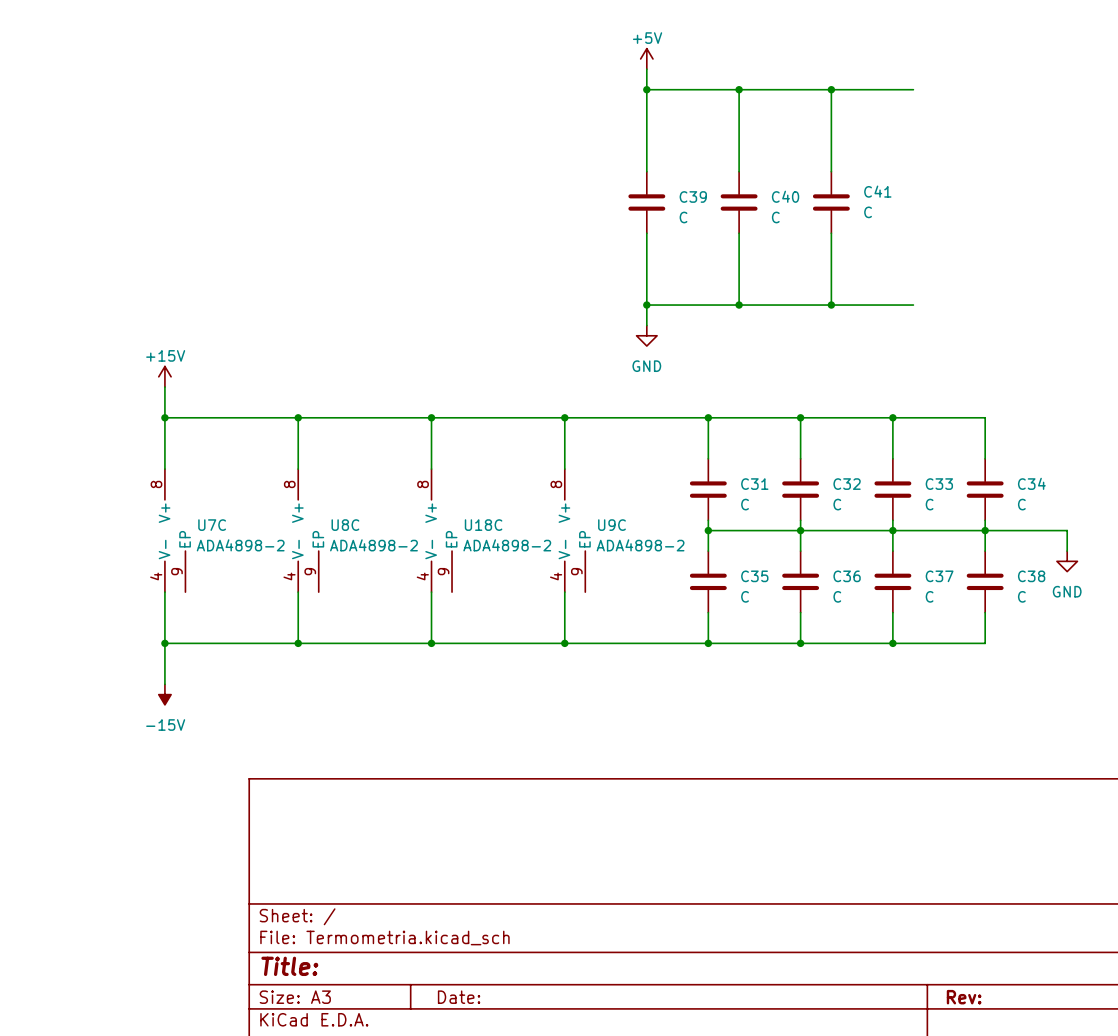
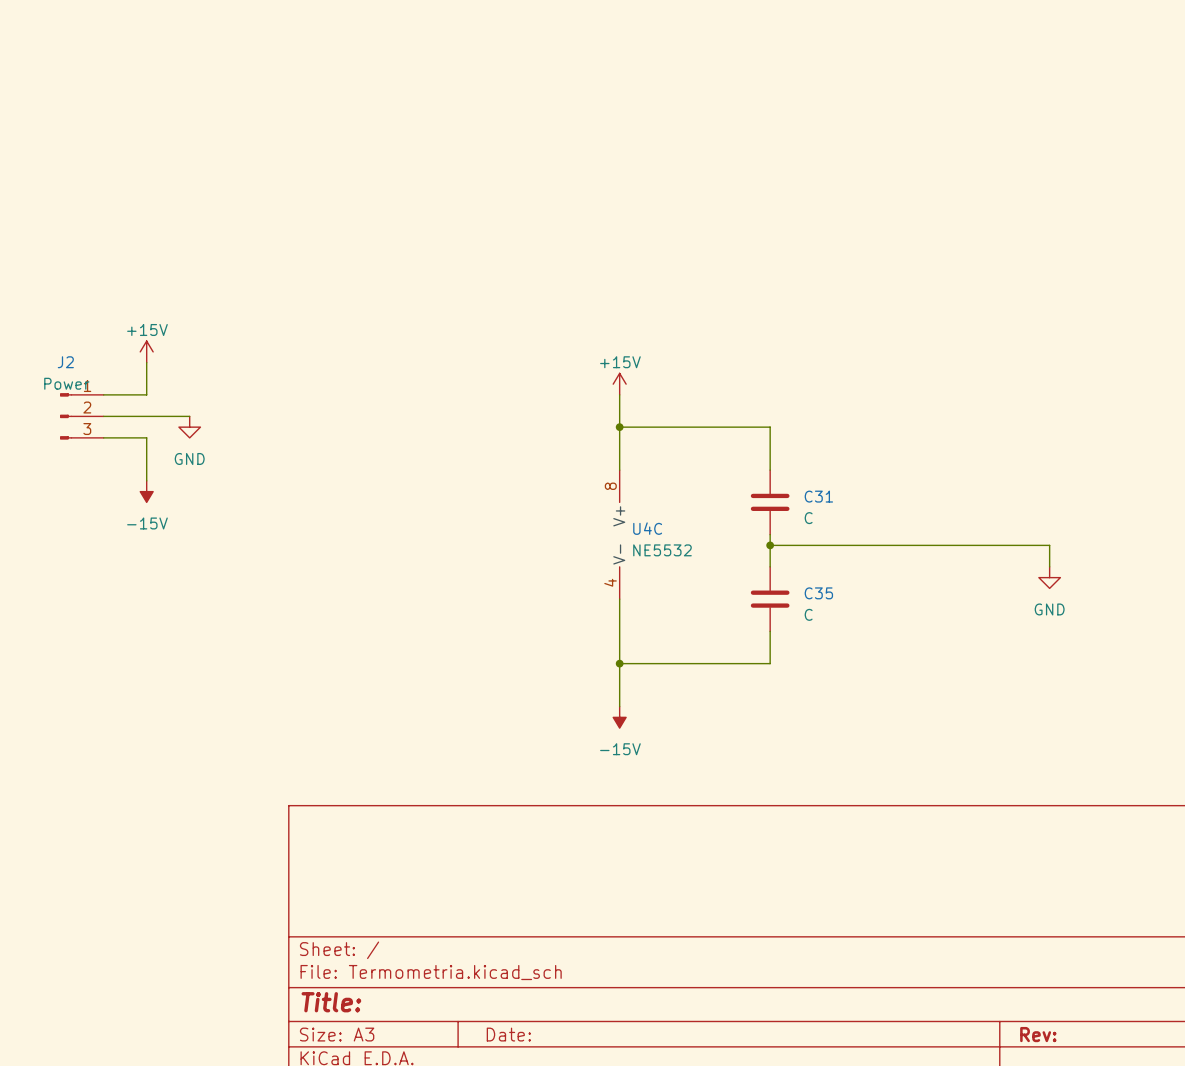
power symbol: +5V (646, 58) -> none
wire: (646, 69) (646, 171) -> none
wire: (646, 89) (913, 89) -> none
junction: (646, 89) -> none
wire: (739, 89) (739, 171) -> none
junction: (739, 89) -> none
wire: (831, 89) (831, 171) -> none
junction: (831, 89) -> none
C39: C (646, 202) -> none
C40: C (739, 202) -> none
C41: C (831, 202) -> none
wire: (646, 233) (646, 325) -> none
wire: (739, 233) (739, 305) -> none
wire: (831, 233) (831, 305) -> none
wire: (646, 305) (913, 305) -> none
junction: (646, 305) -> none
junction: (739, 305) -> none
junction: (831, 305) -> none
power symbol: GND (646, 335) -> none
wire: none -> (146, 362) (146, 394) (103, 394)
power symbol position: +15V (164, 376) -> +15V (146, 351)
power symbol: none -> +15V (619, 384)
wire: (164, 387) (164, 469) -> none
J2: none -> Power (81, 416)
wire: none -> (103, 416) (189, 416)
power symbol: none -> GND (189, 427)
wire: (164, 417) (564, 417) -> (619, 394) (619, 427)
junction: (164, 417) -> none
wire: (298, 417) (298, 469) -> none
junction: (298, 417) -> none
wire: (431, 417) (431, 469) -> none
junction: (431, 417) -> none
wire: (708, 417) (985, 417) (985, 458) -> none
junction: (708, 417) -> none
wire: (800, 417) (800, 458) -> none
junction: (800, 417) -> none
wire: (892, 417) (892, 458) -> none
junction: (892, 417) -> none
wire: none -> (103, 437) (146, 437) (146, 480)
power symbol: none -> -15V (146, 491)
C32: C (800, 489) -> none
C33: C (892, 489) -> none
C34: C (985, 489) -> none
U4C: none -> NE5532 (619, 534)
wire: (800, 520) (800, 551) -> none
wire: (892, 520) (892, 551) -> none
wire: (985, 520) (985, 551) -> none
U7C: ADA4898-2 (175, 530) -> none
U8C: ADA4898-2 (308, 530) -> none
U18C: ADA4898-2 (441, 530) -> none
U9C: ADA4898-2 (575, 530) -> none
junction: (800, 530) -> none
junction: (892, 530) -> none
wire: (974, 530) (1067, 530) (1067, 551) -> (1049, 545) (1049, 566)
junction: (985, 530) -> none
power symbol position: GND (1067, 561) -> GND (1049, 577)
C36: C (800, 581) -> none
C37: C (892, 581) -> none
C38: C (985, 581) -> none
wire: (164, 592) (164, 684) -> none
wire: (298, 592) (298, 643) -> none
wire: (431, 592) (431, 643) -> none
wire: (800, 612) (800, 643) -> none
wire: (892, 612) (892, 643) -> none
wire: (985, 612) (985, 643) (708, 643) -> none
wire: (164, 643) (564, 643) -> (619, 706) (619, 663)
junction: (164, 643) -> none
junction: (298, 643) -> none
junction: (431, 643) -> none
junction: (708, 643) -> none
junction: (800, 643) -> none
junction: (892, 643) -> none
power symbol: -15V (164, 694) -> none
power symbol: none -> -15V (619, 717)

